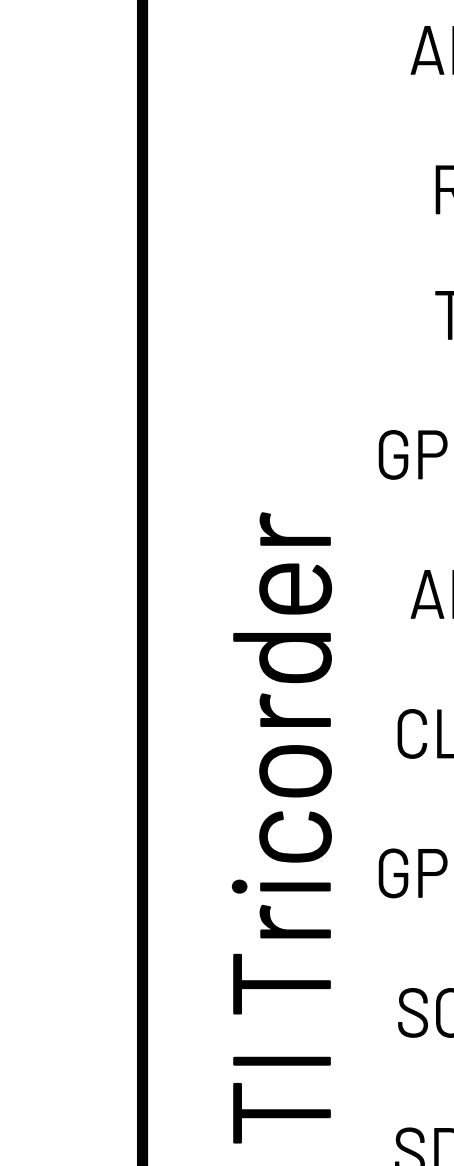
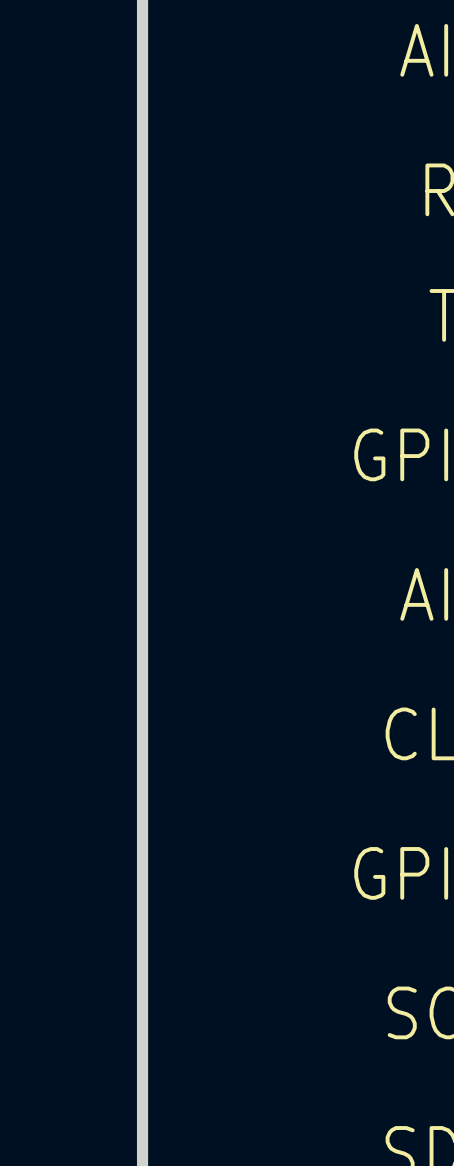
text: TI Tricorder (281, 827) -> none

